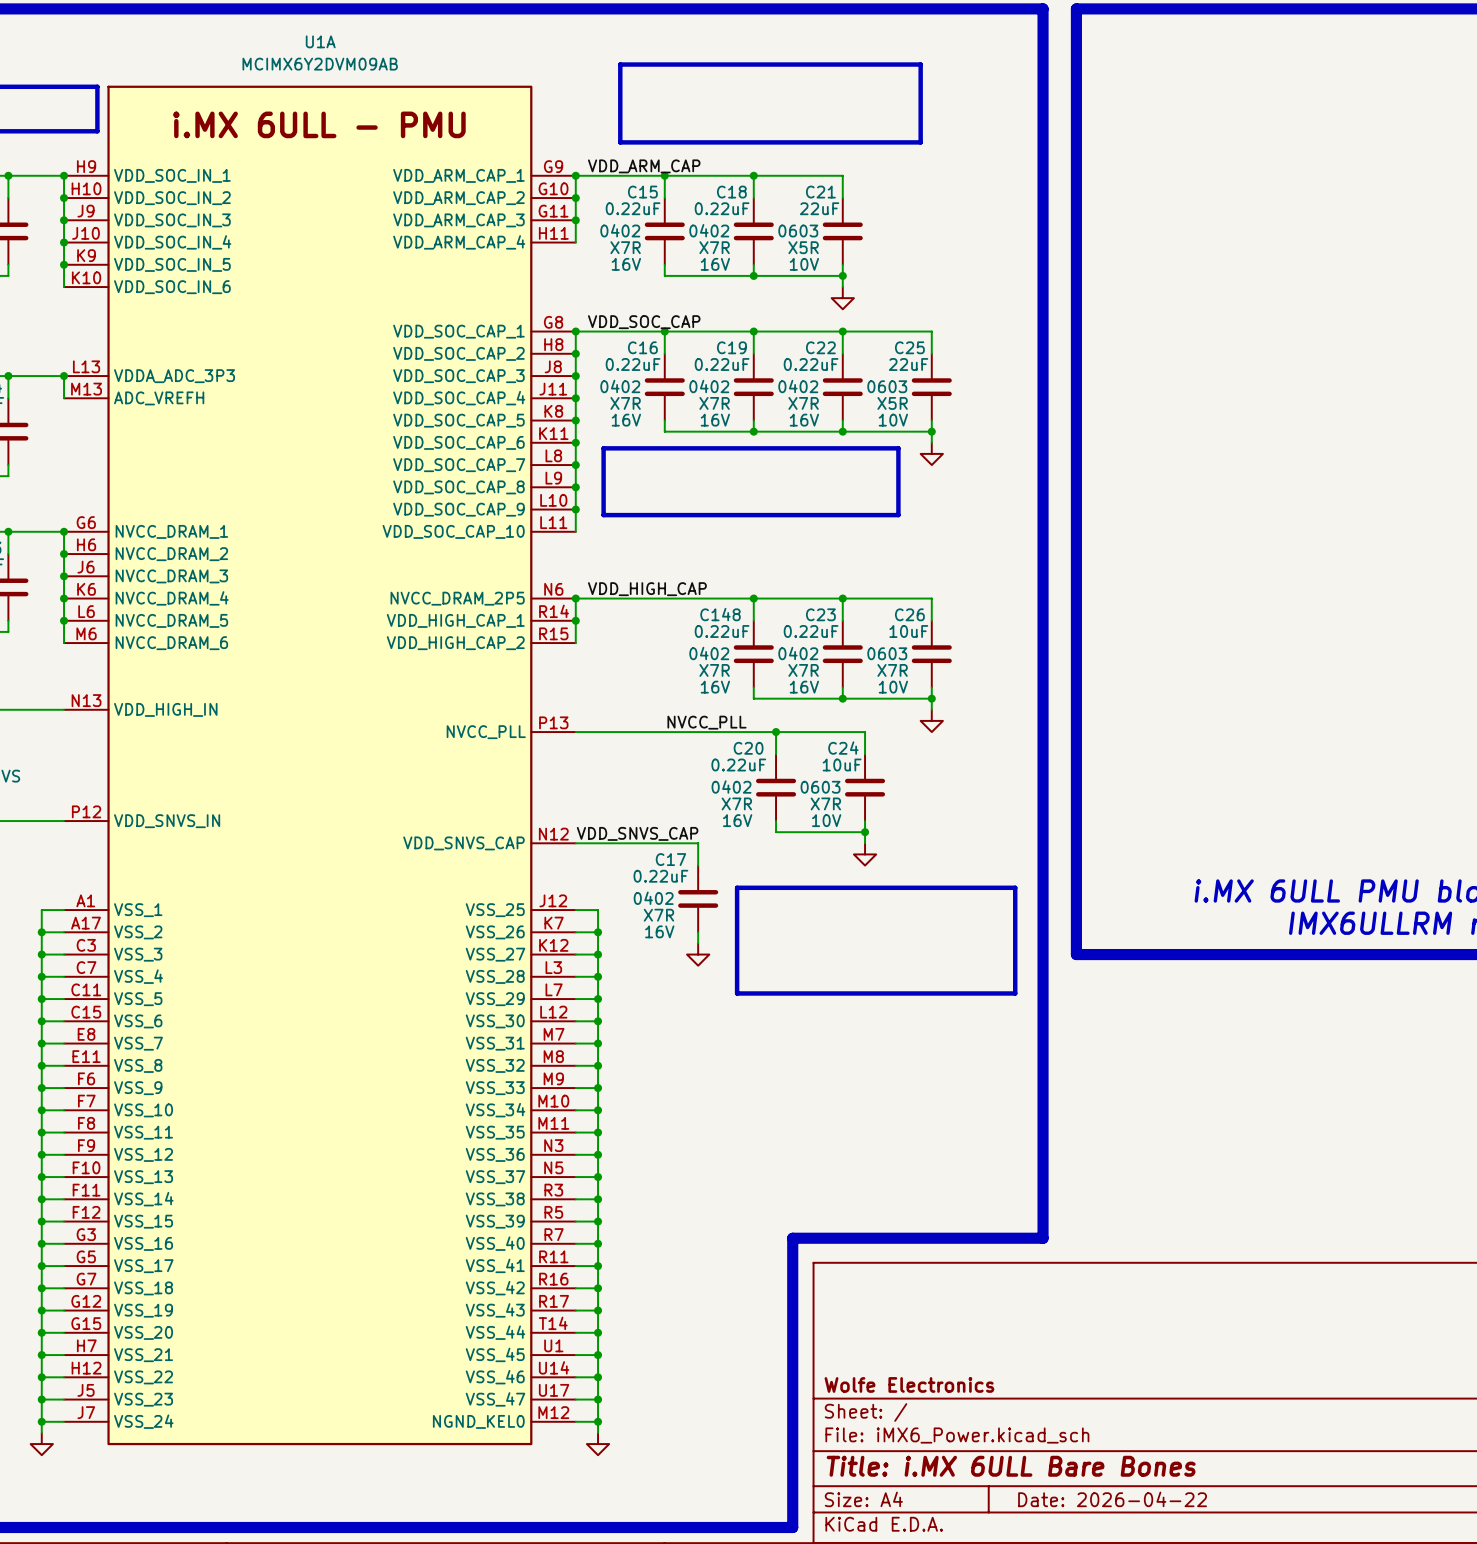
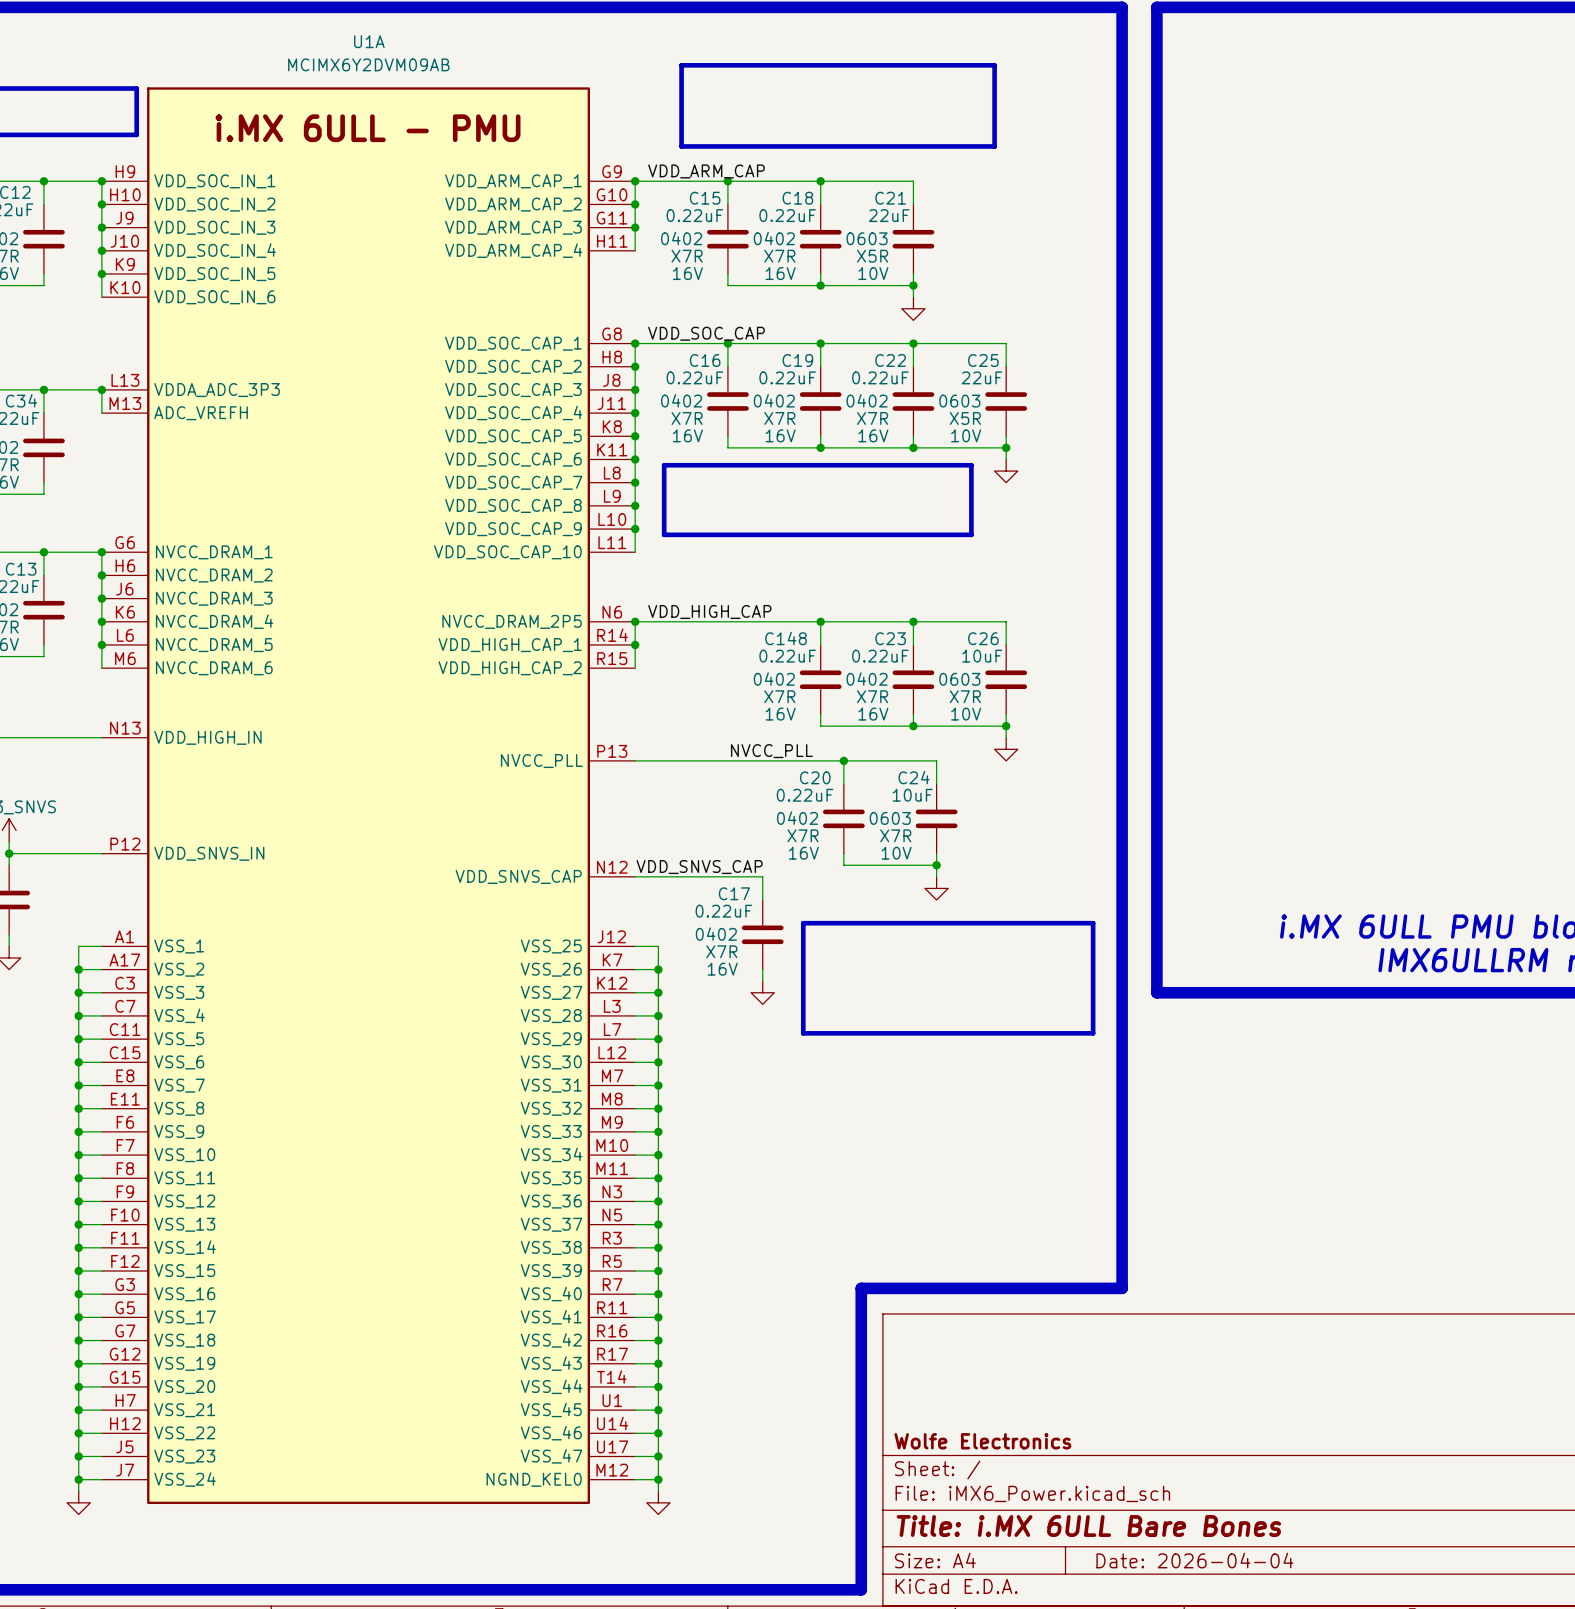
title block: Date: 2026-04-22 (1112, 1499) -> Date: 2026-04-04 (1194, 1560)

